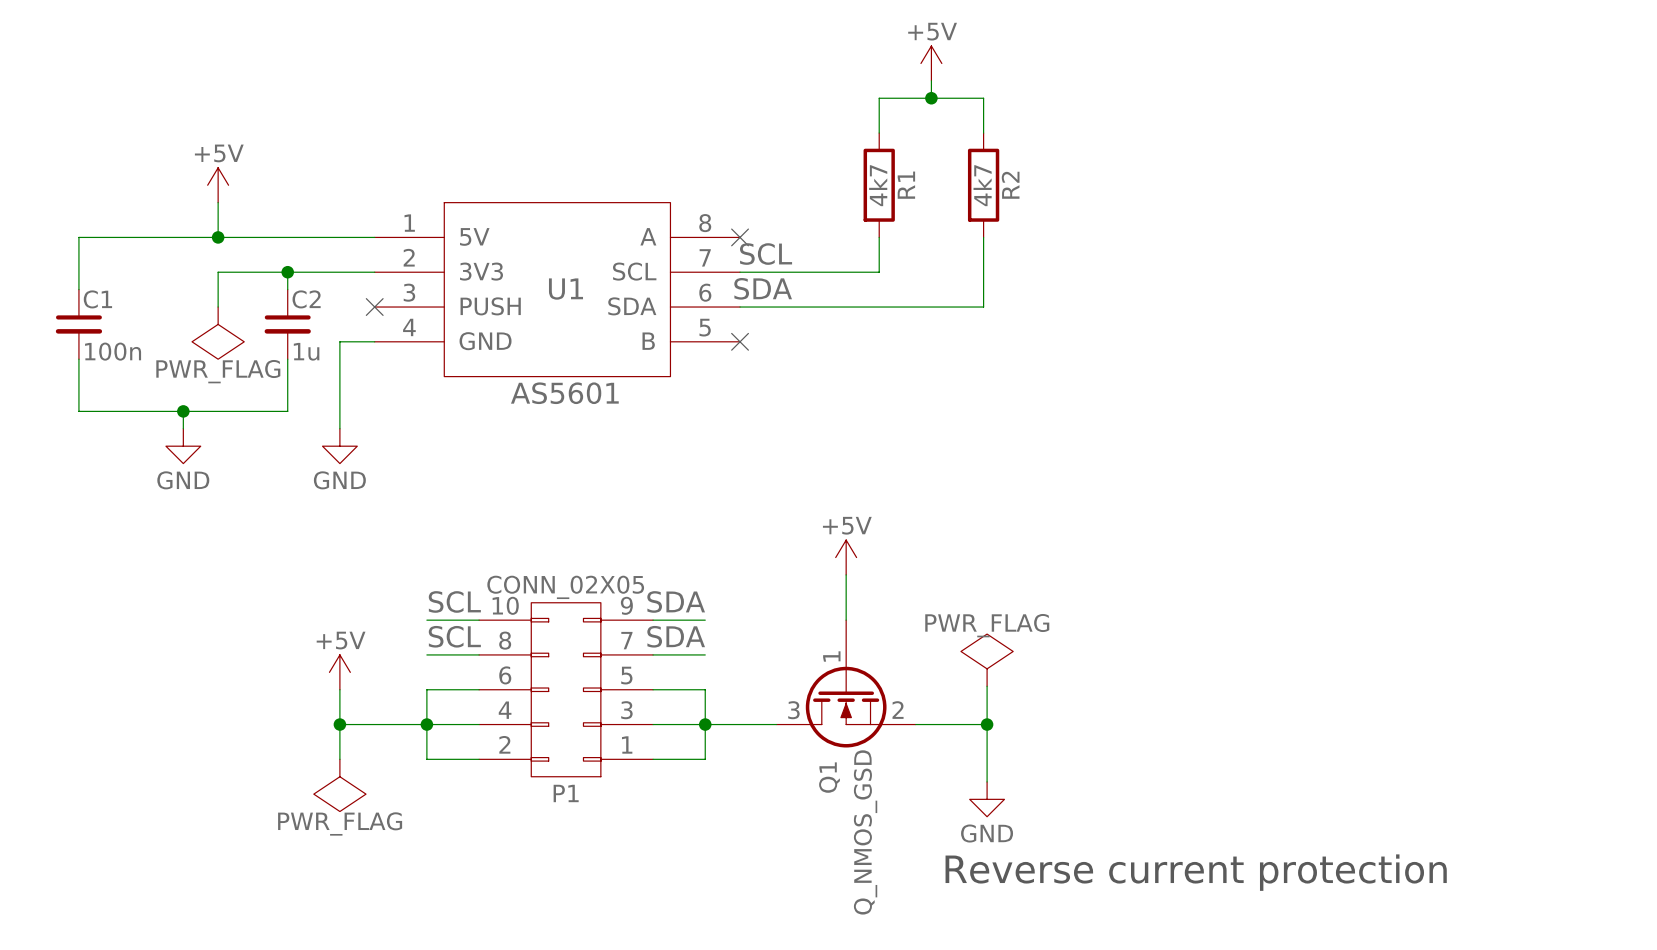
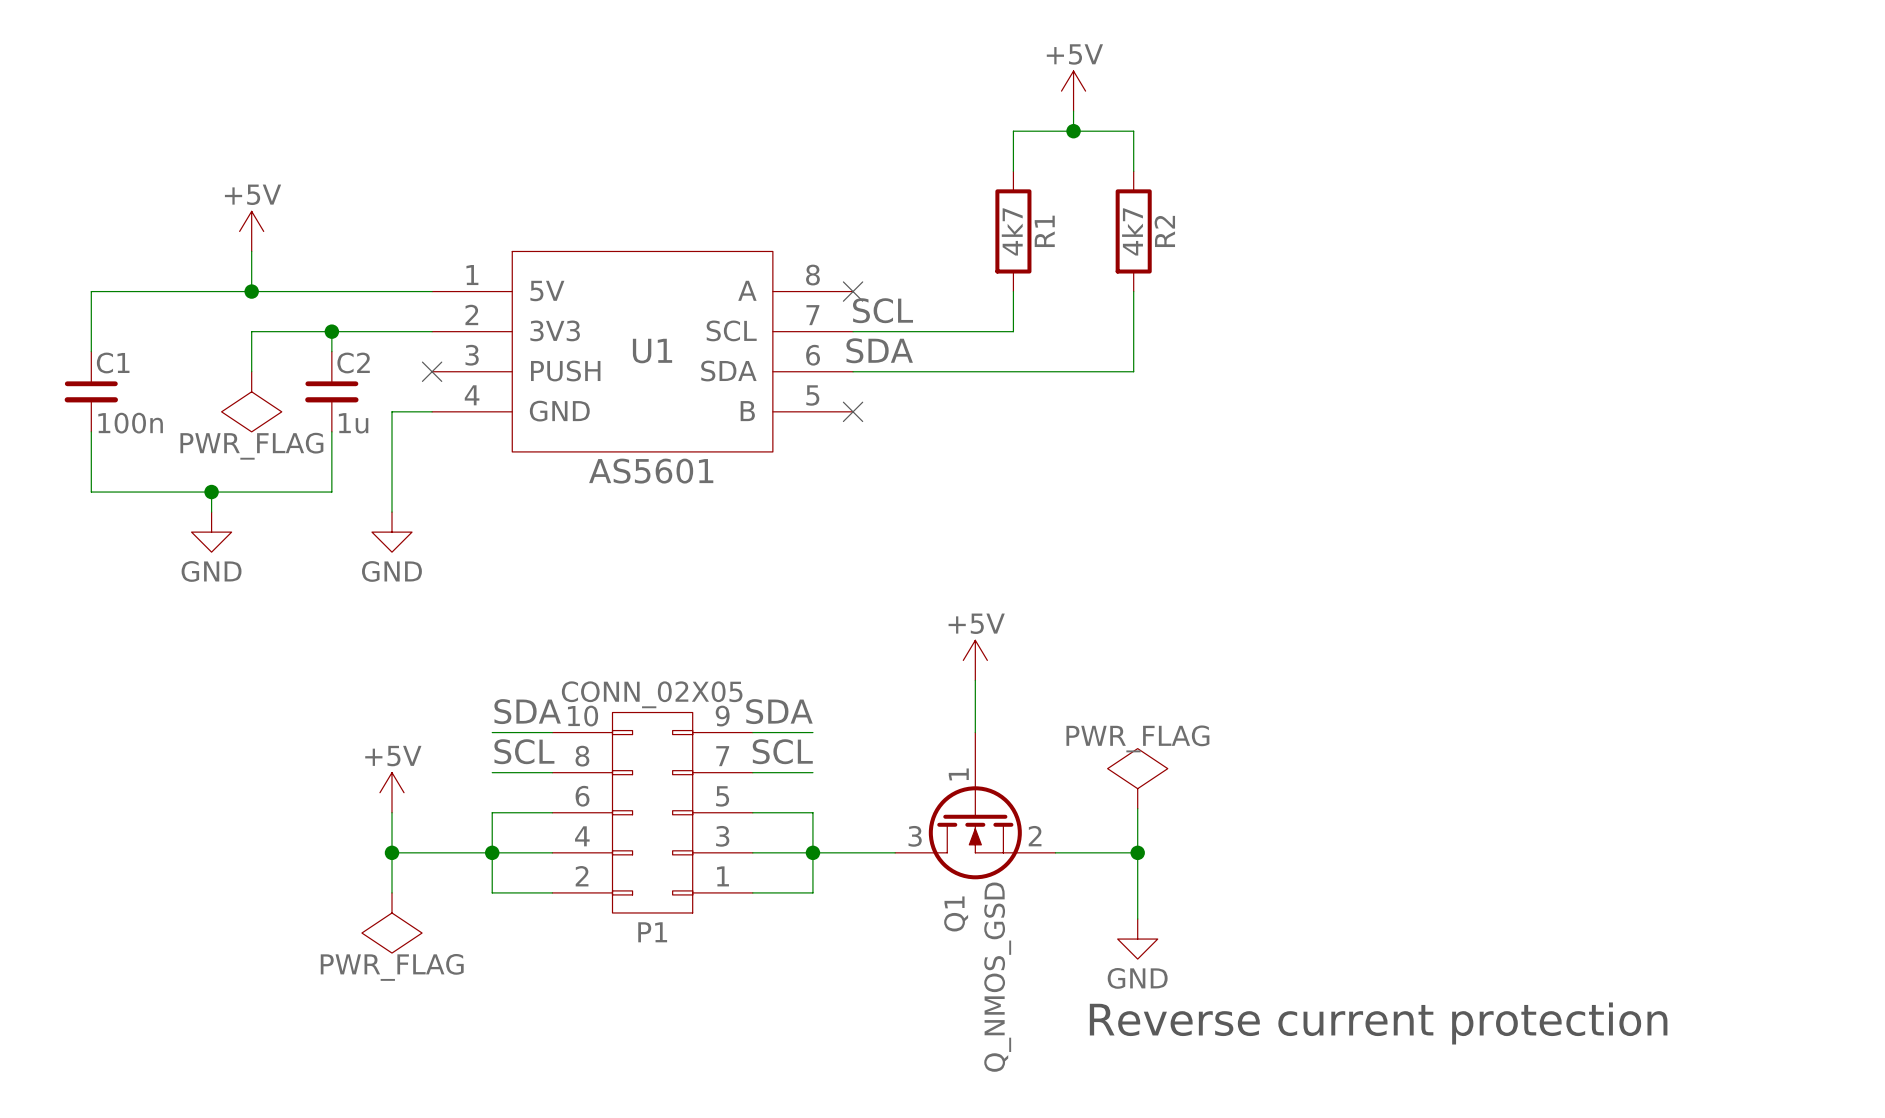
label: SCL (454, 601) -> SDA (527, 711)
label: SDA (676, 636) -> SCL (782, 751)

